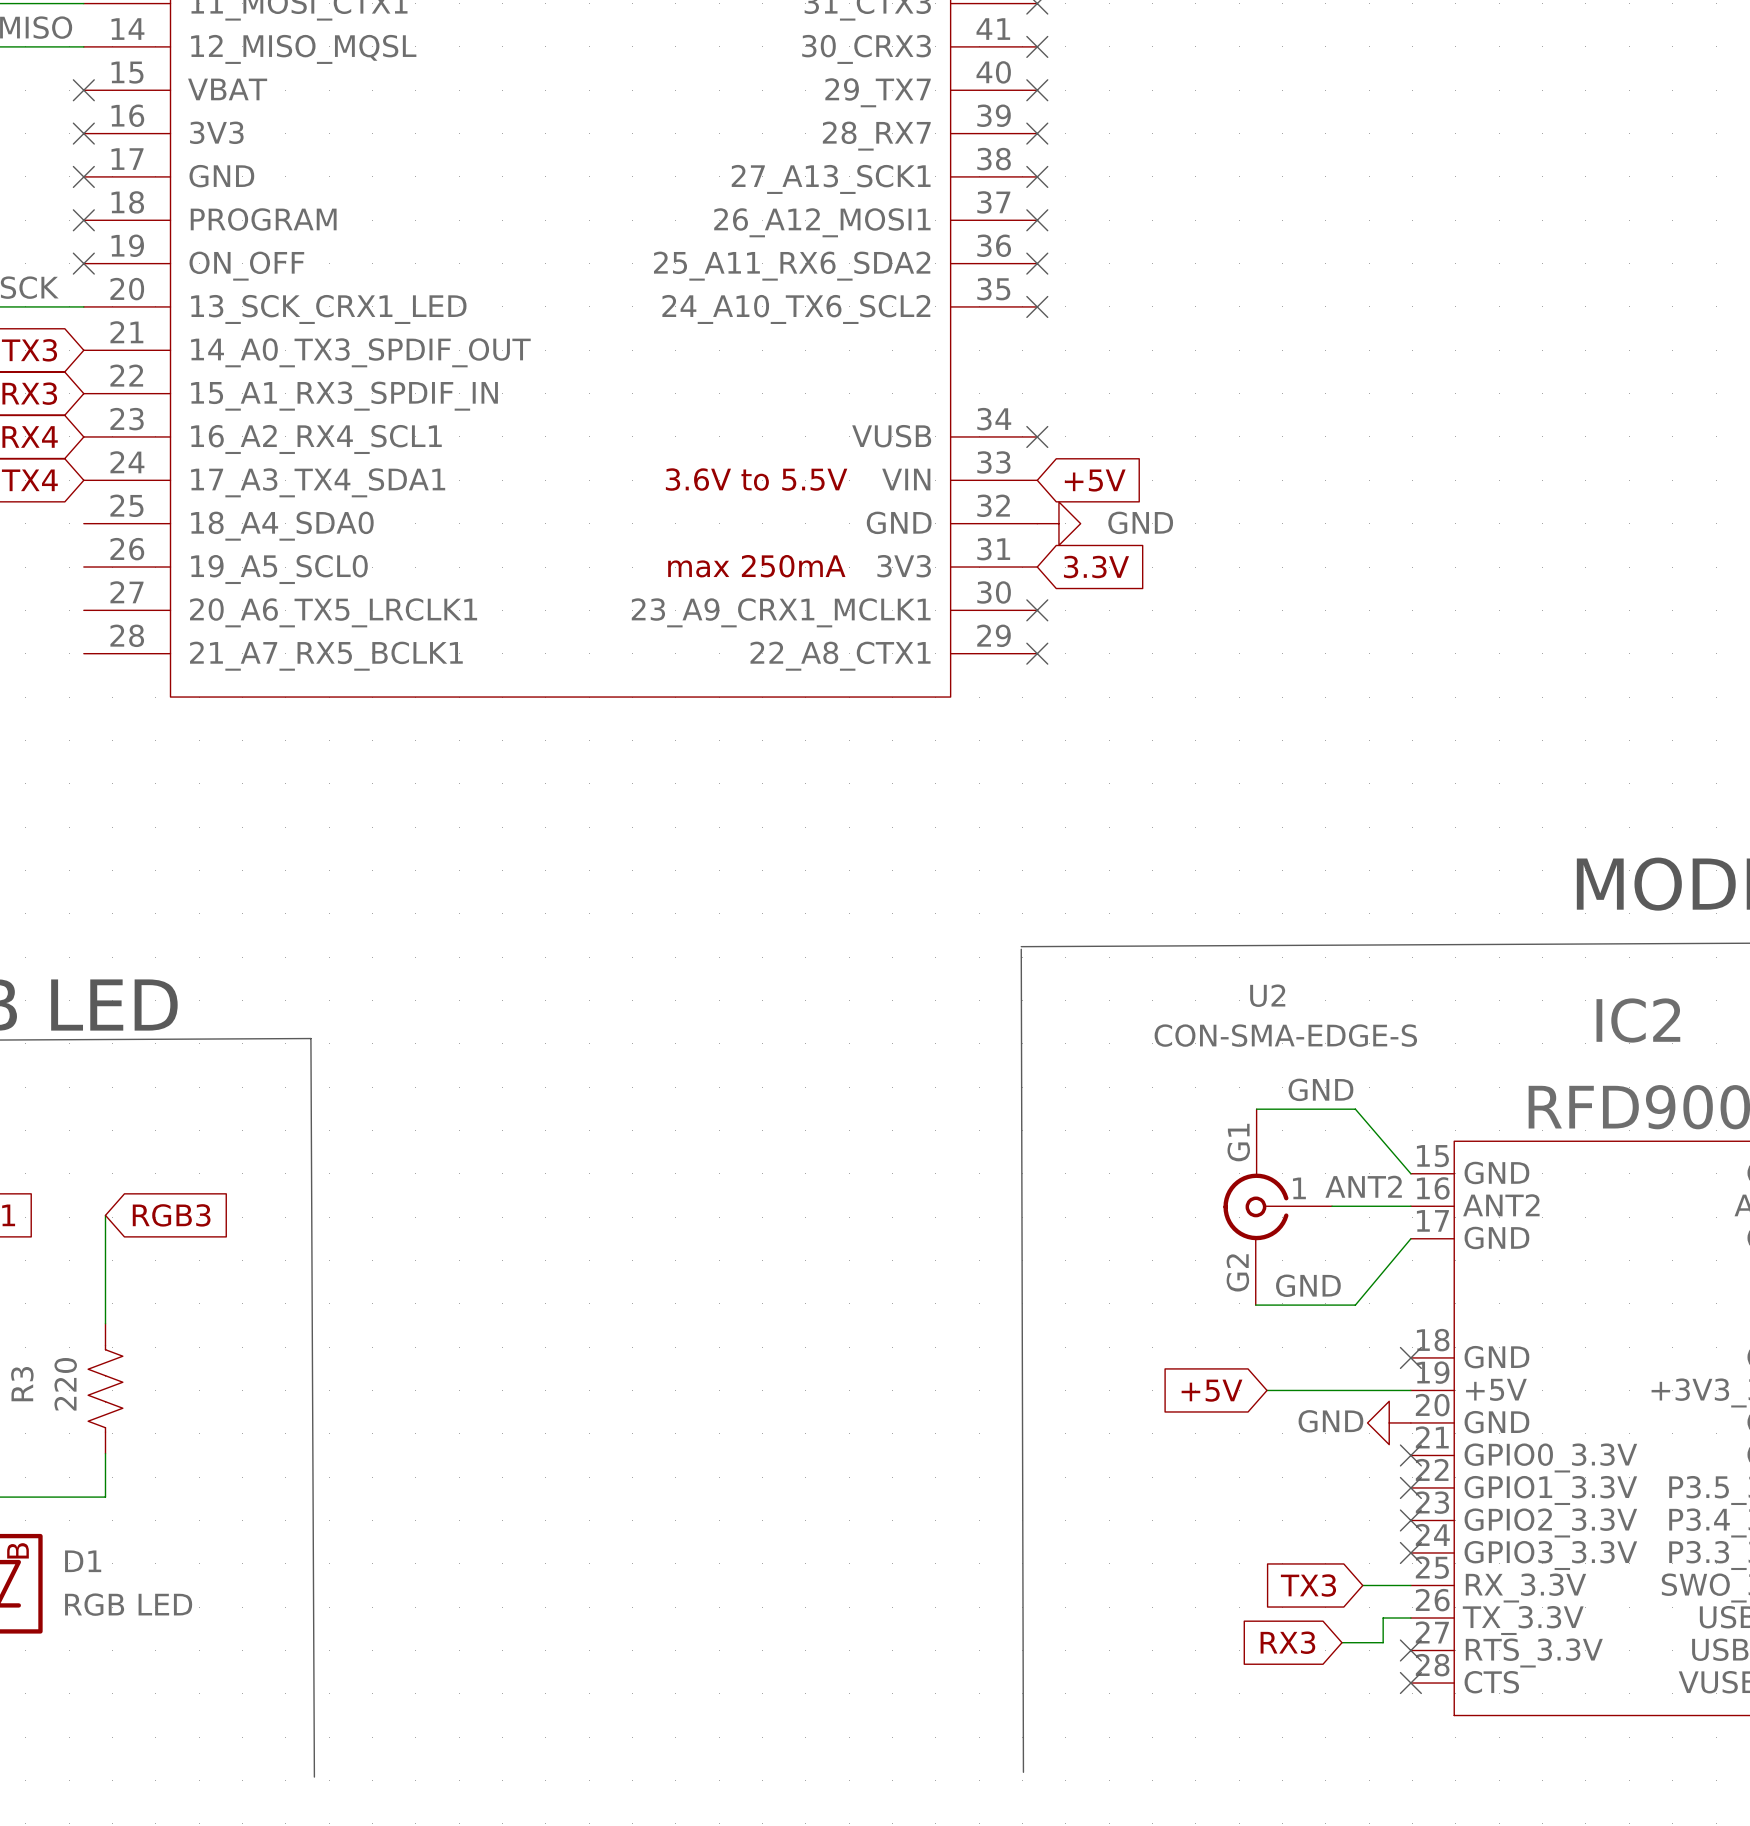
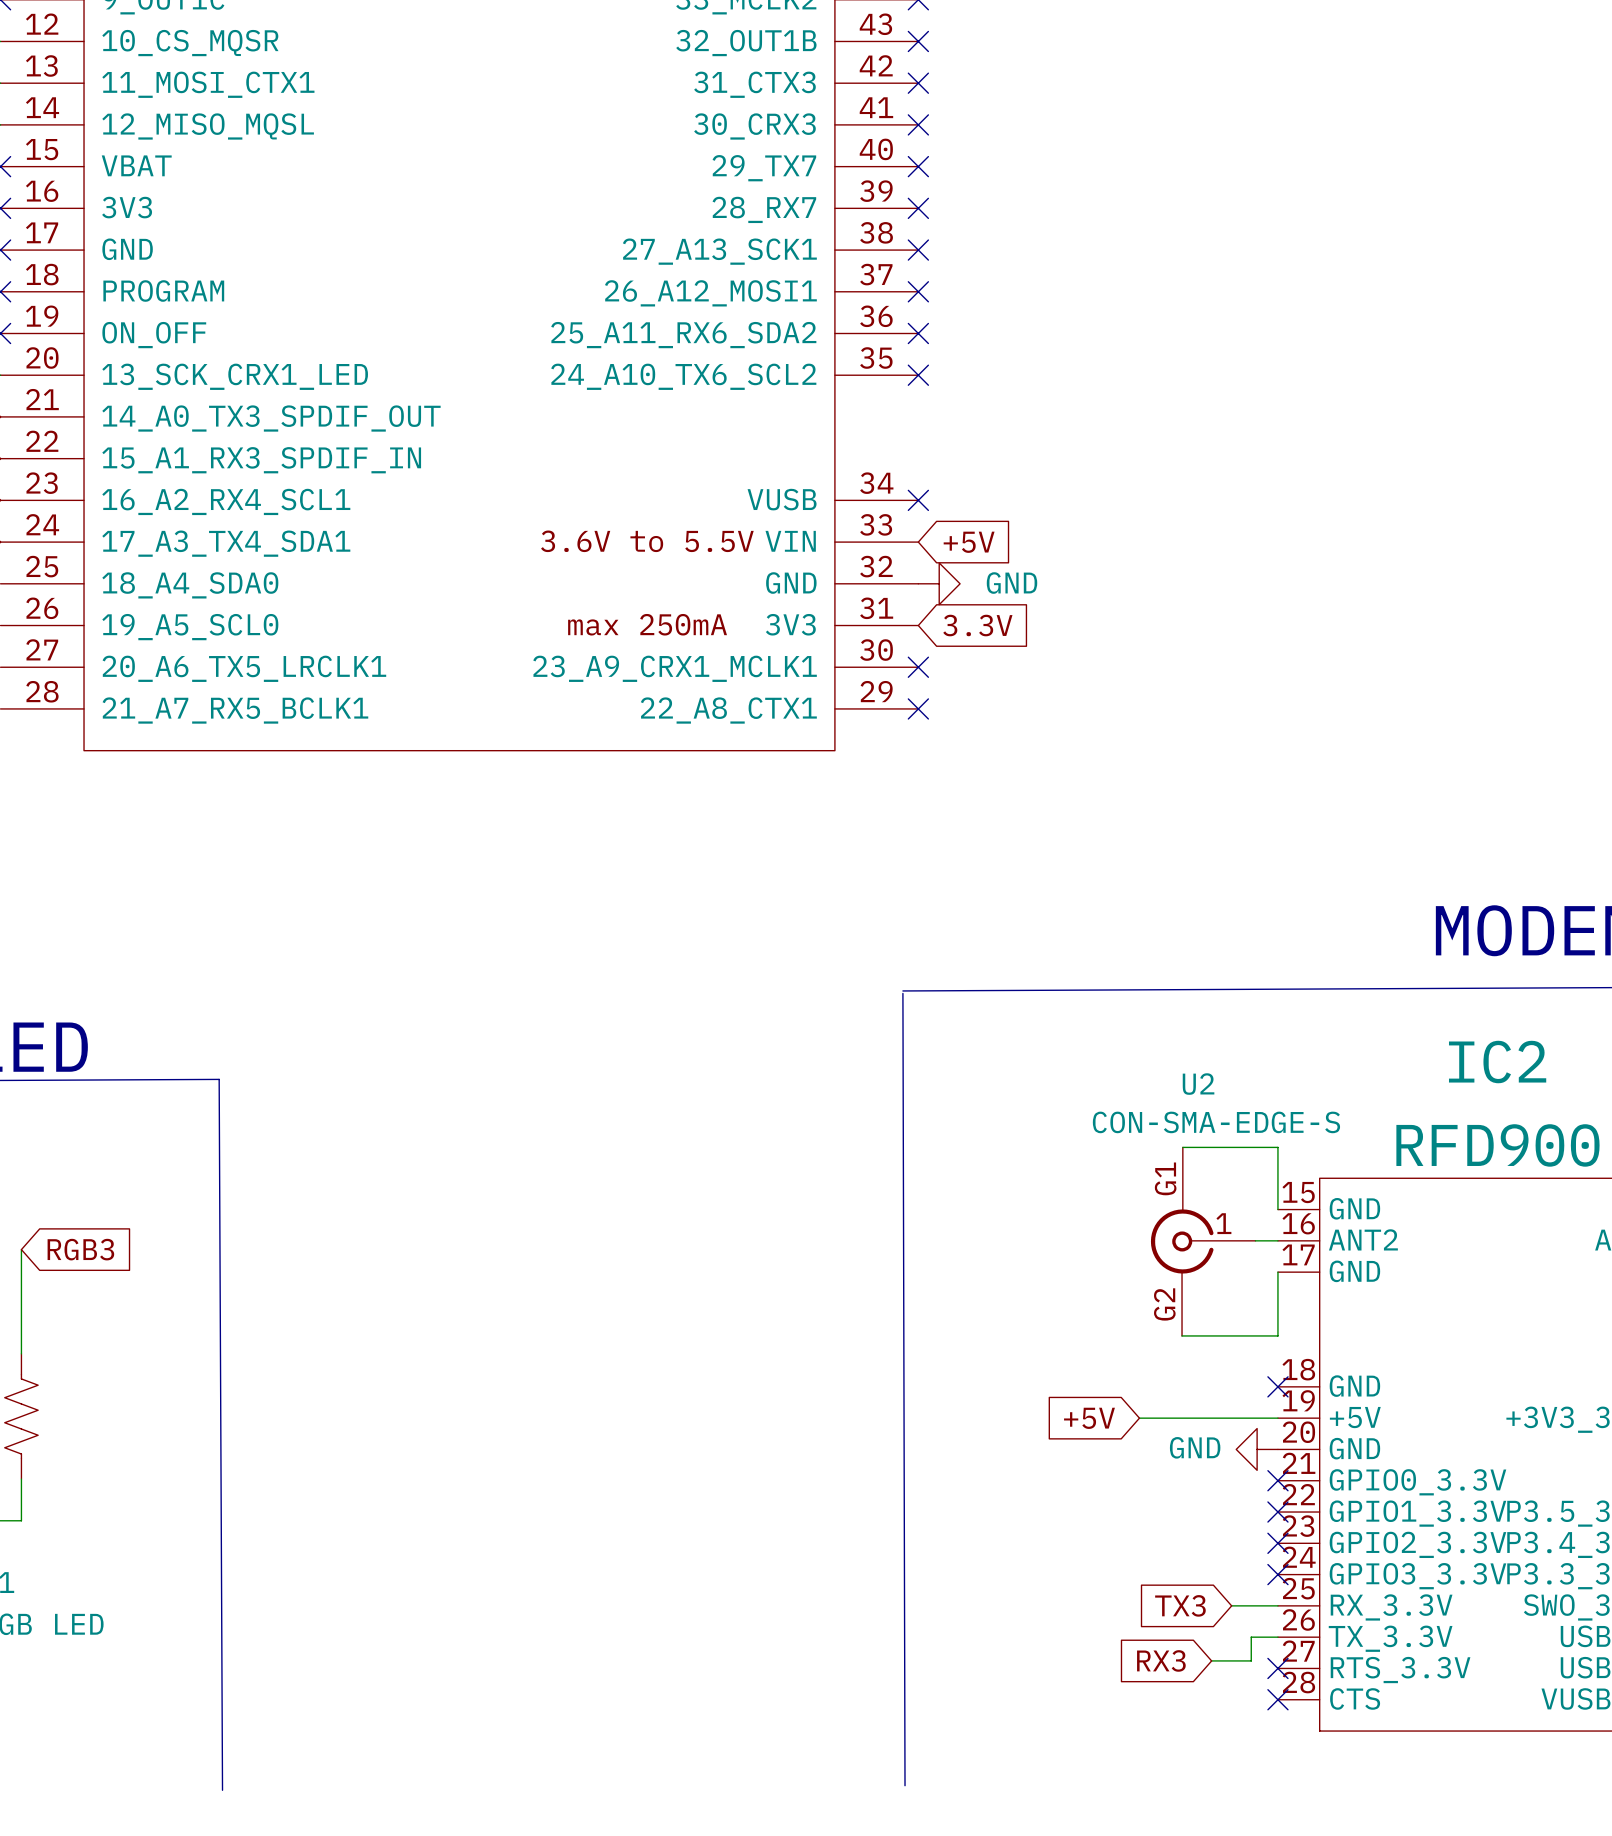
U2 name position: U2 (1267, 995) -> U2 (1198, 1084)
U2 value position: CON-SMA-EDGE-S (1285, 1035) -> CON-SMA-EDGE-S (1216, 1122)
label: GND (1320, 1089) -> none
wire: (1256, 1109) (1312, 1109) -> none
wire: (1355, 1109) (1410, 1173) -> (1224, 1147) (1277, 1147) (1277, 1209)
label: ANT2 (1363, 1186) -> none
U2 position: (1277, 1207) -> (1203, 1241)
wire: (1410, 1238) (1355, 1305) -> (1277, 1272) (1277, 1335) (1224, 1335)
label: GND (1308, 1285) -> none
wire: (1255, 1305) (1311, 1305) -> none

